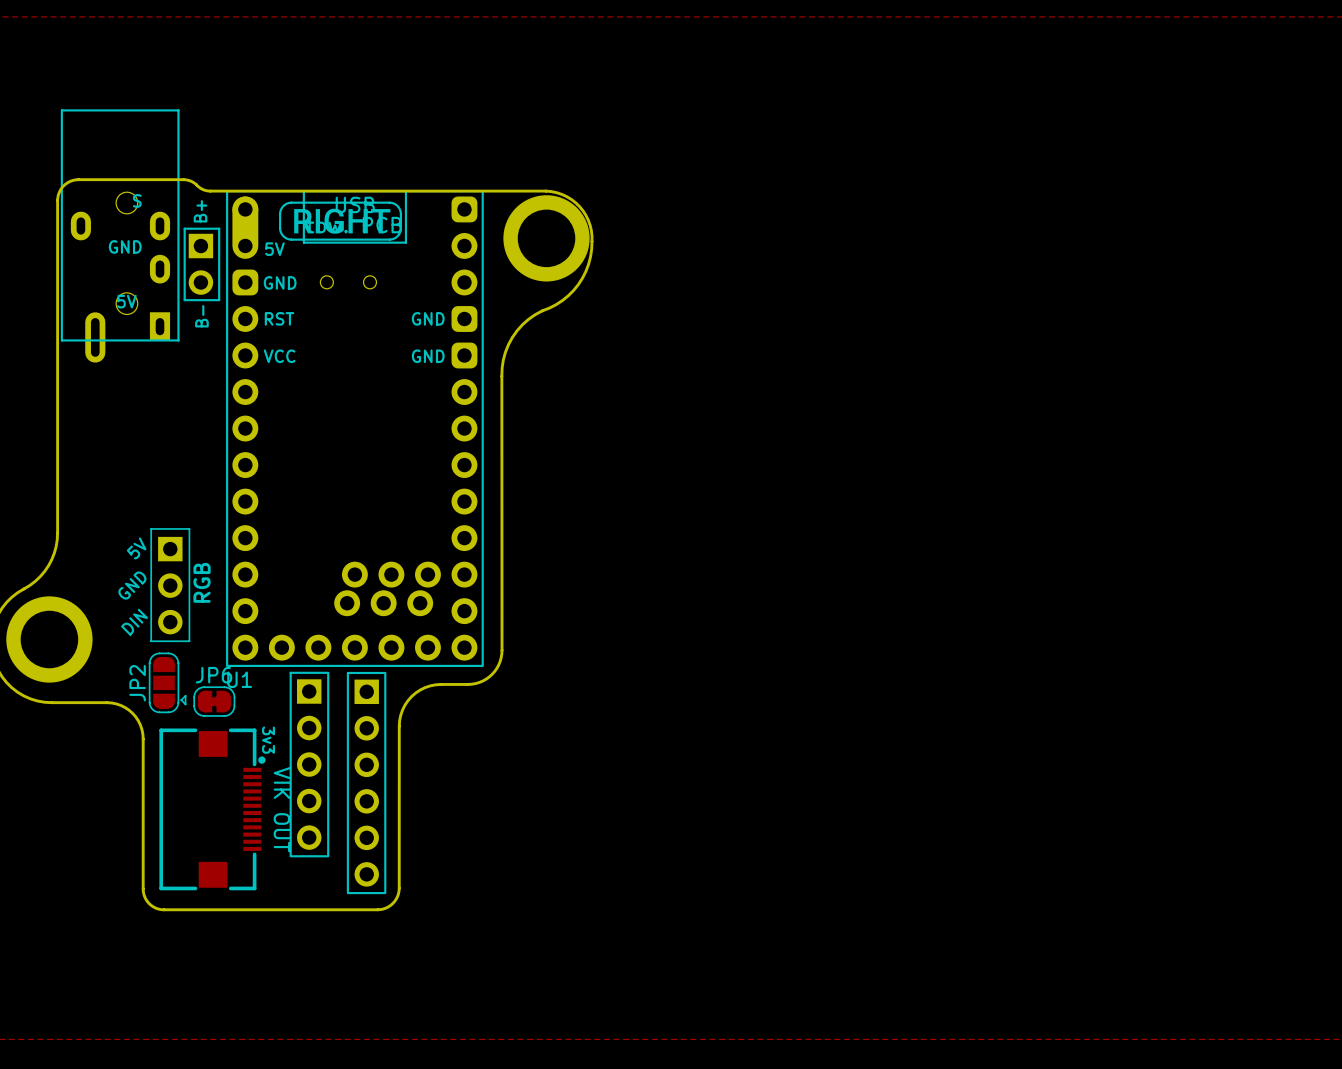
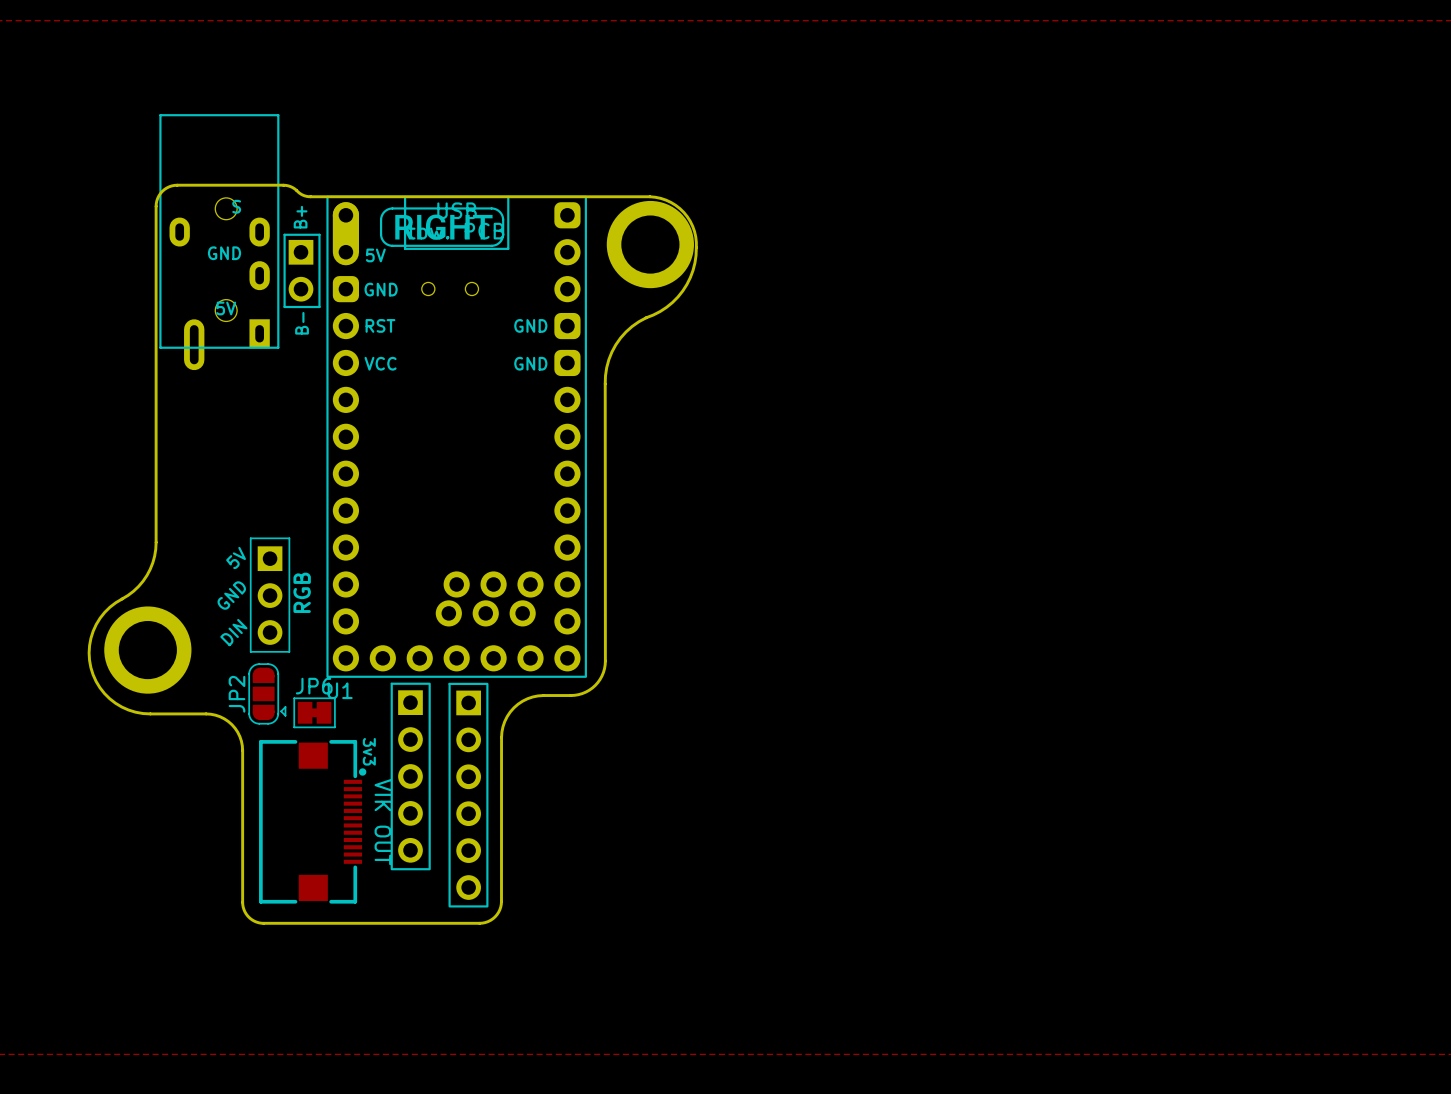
JP6 footprint: [193, 686, 236, 717] -> [293, 697, 336, 729]

